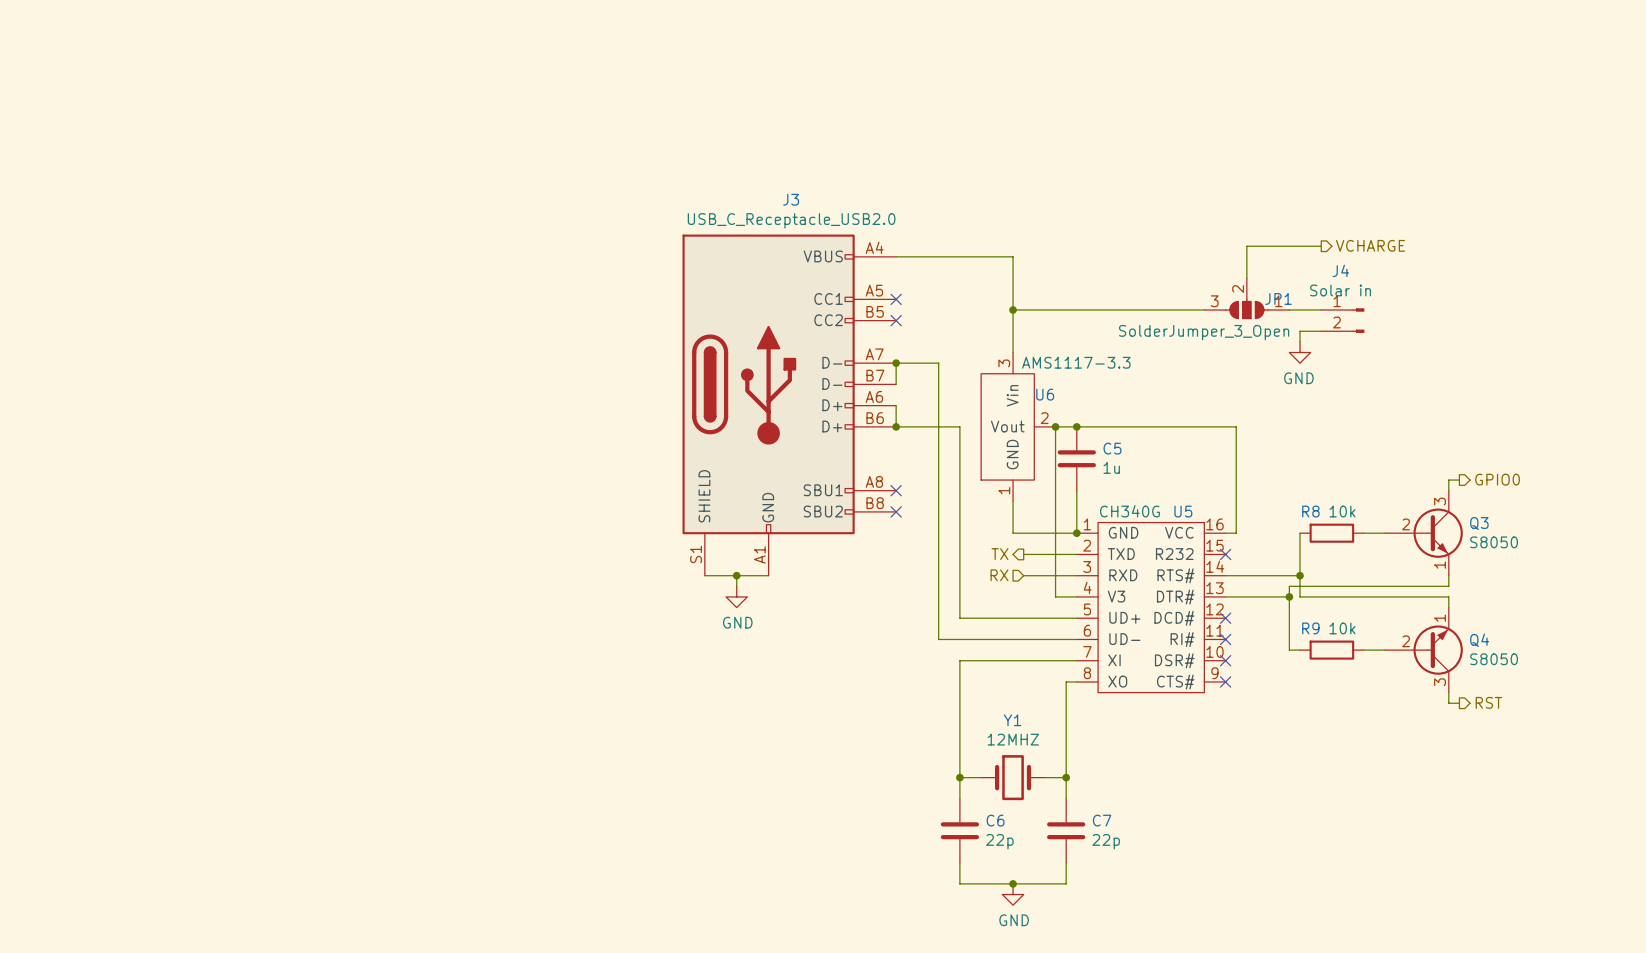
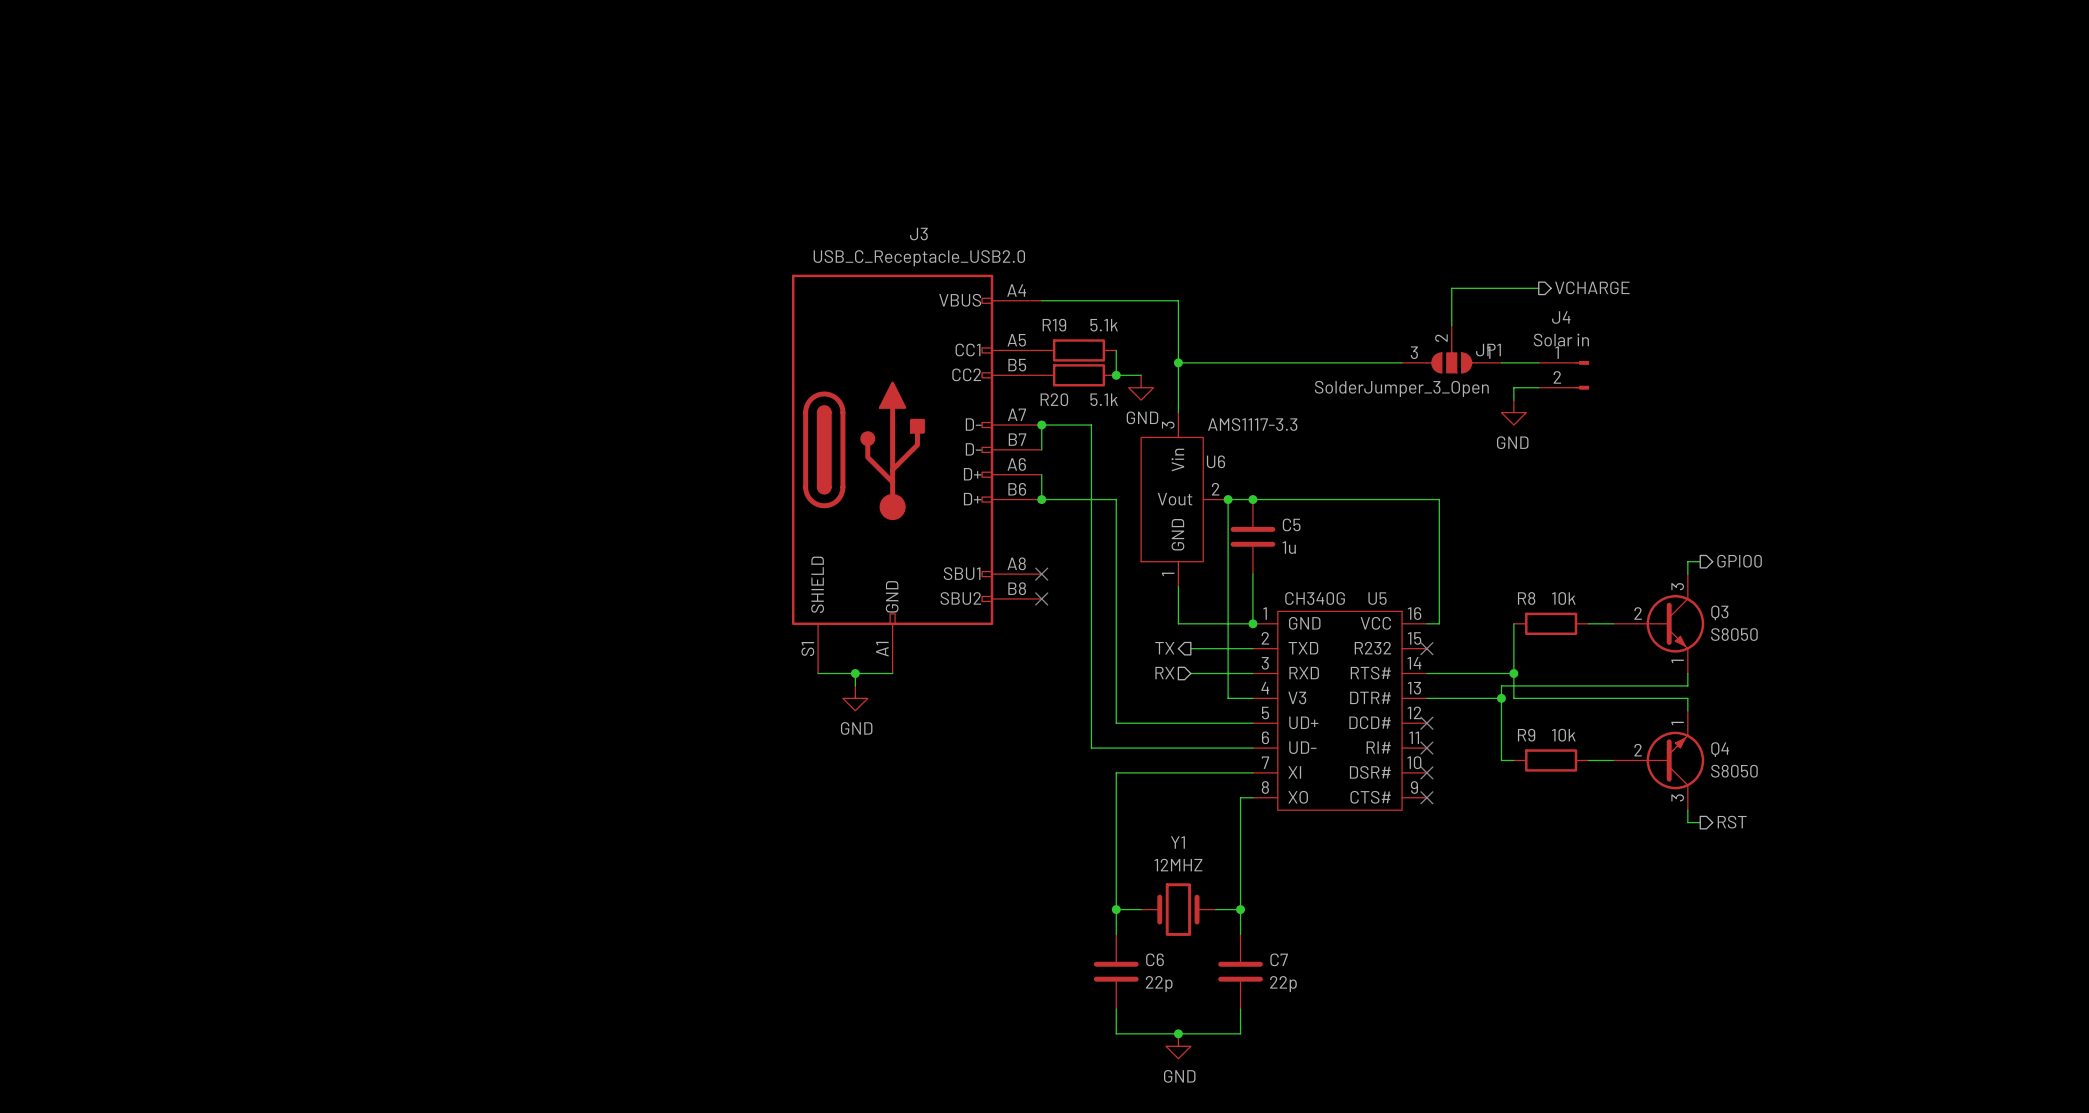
no-connect mark: (896, 299) -> none
R19: none -> 5.1k (1079, 350)
wire: none -> (1116, 350) (1116, 375) (1141, 375)
no-connect mark: (896, 320) -> none
R20: none -> 5.1k (1079, 375)
junction: none -> (1116, 375)
power symbol: none -> GND (1141, 387)

